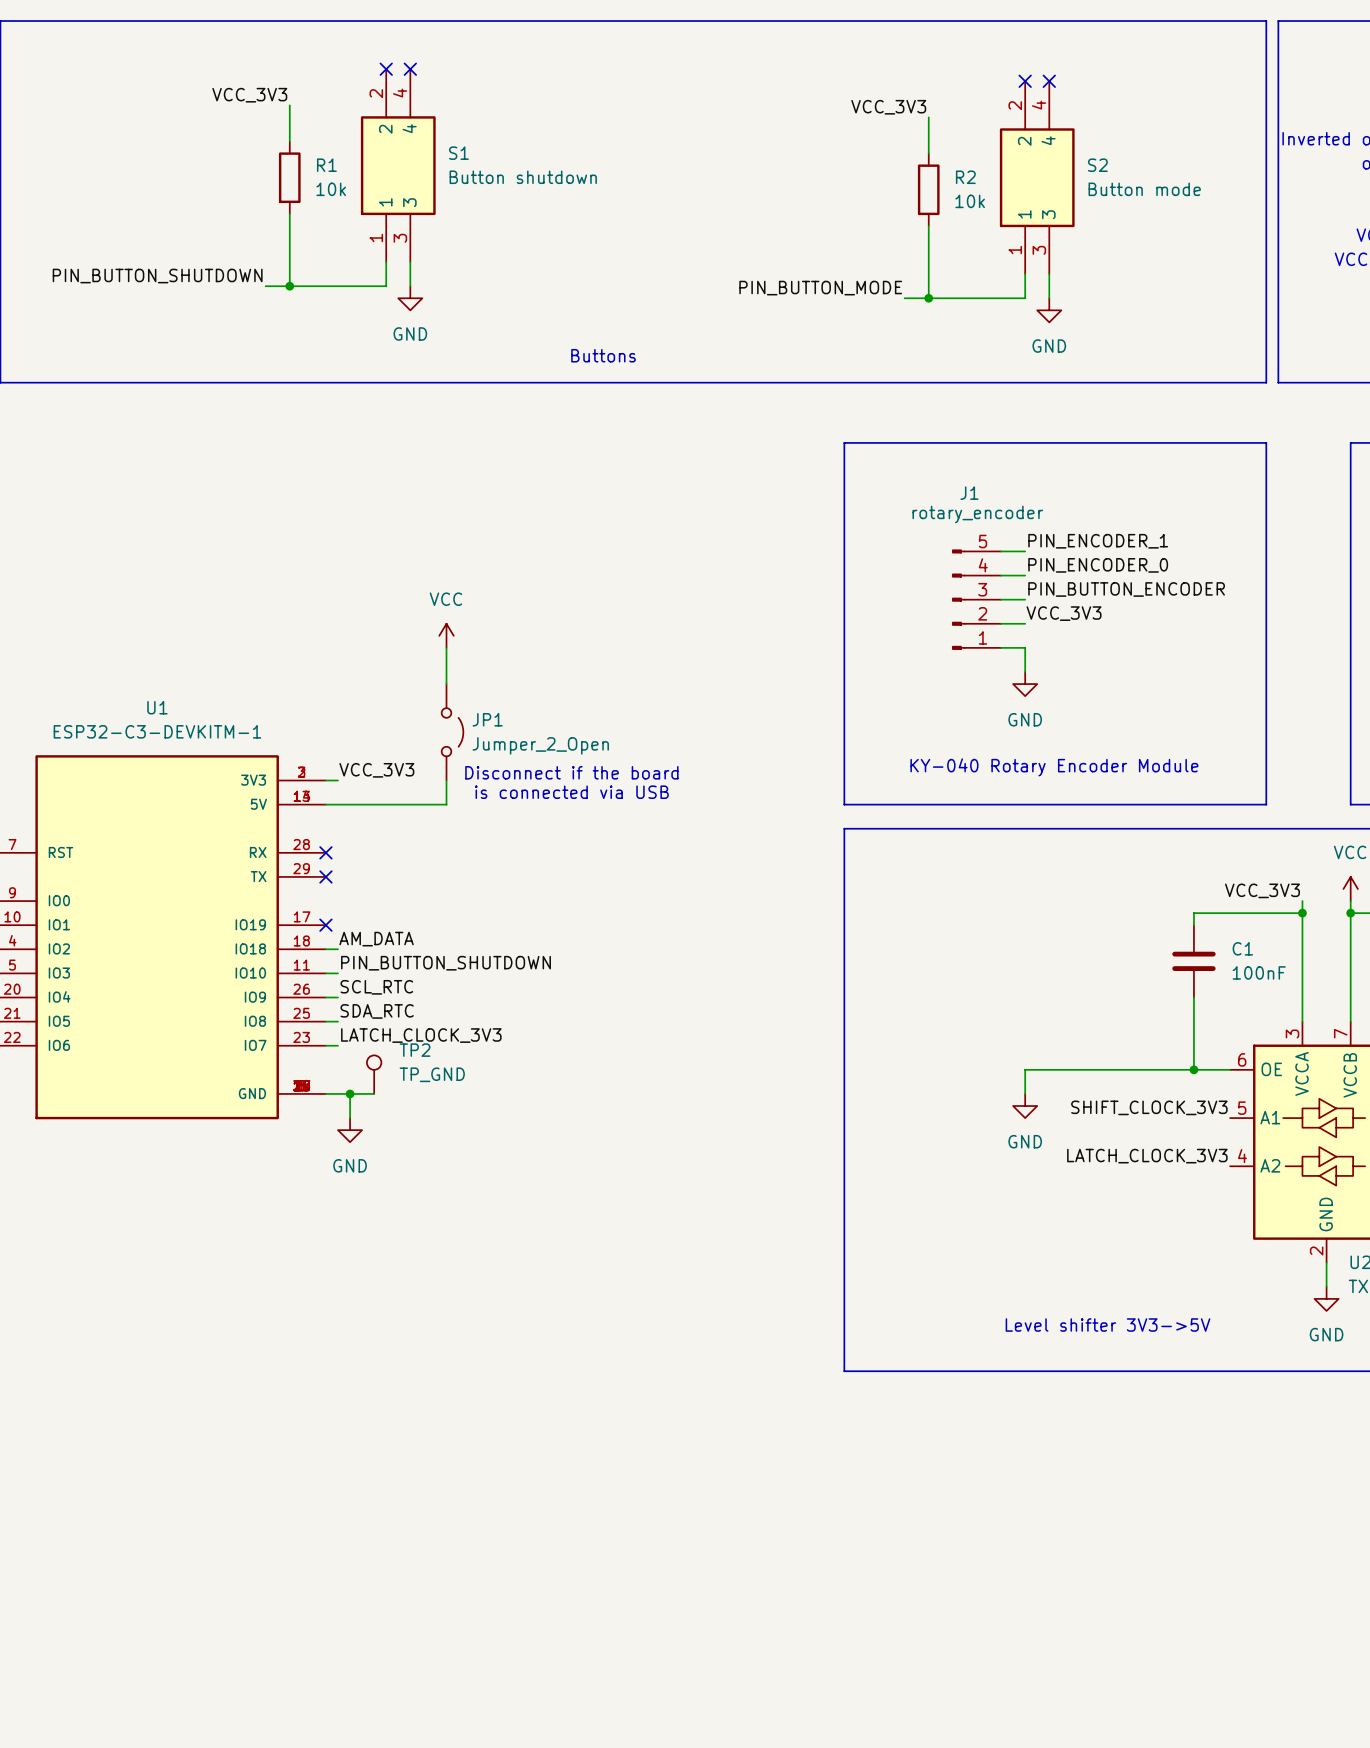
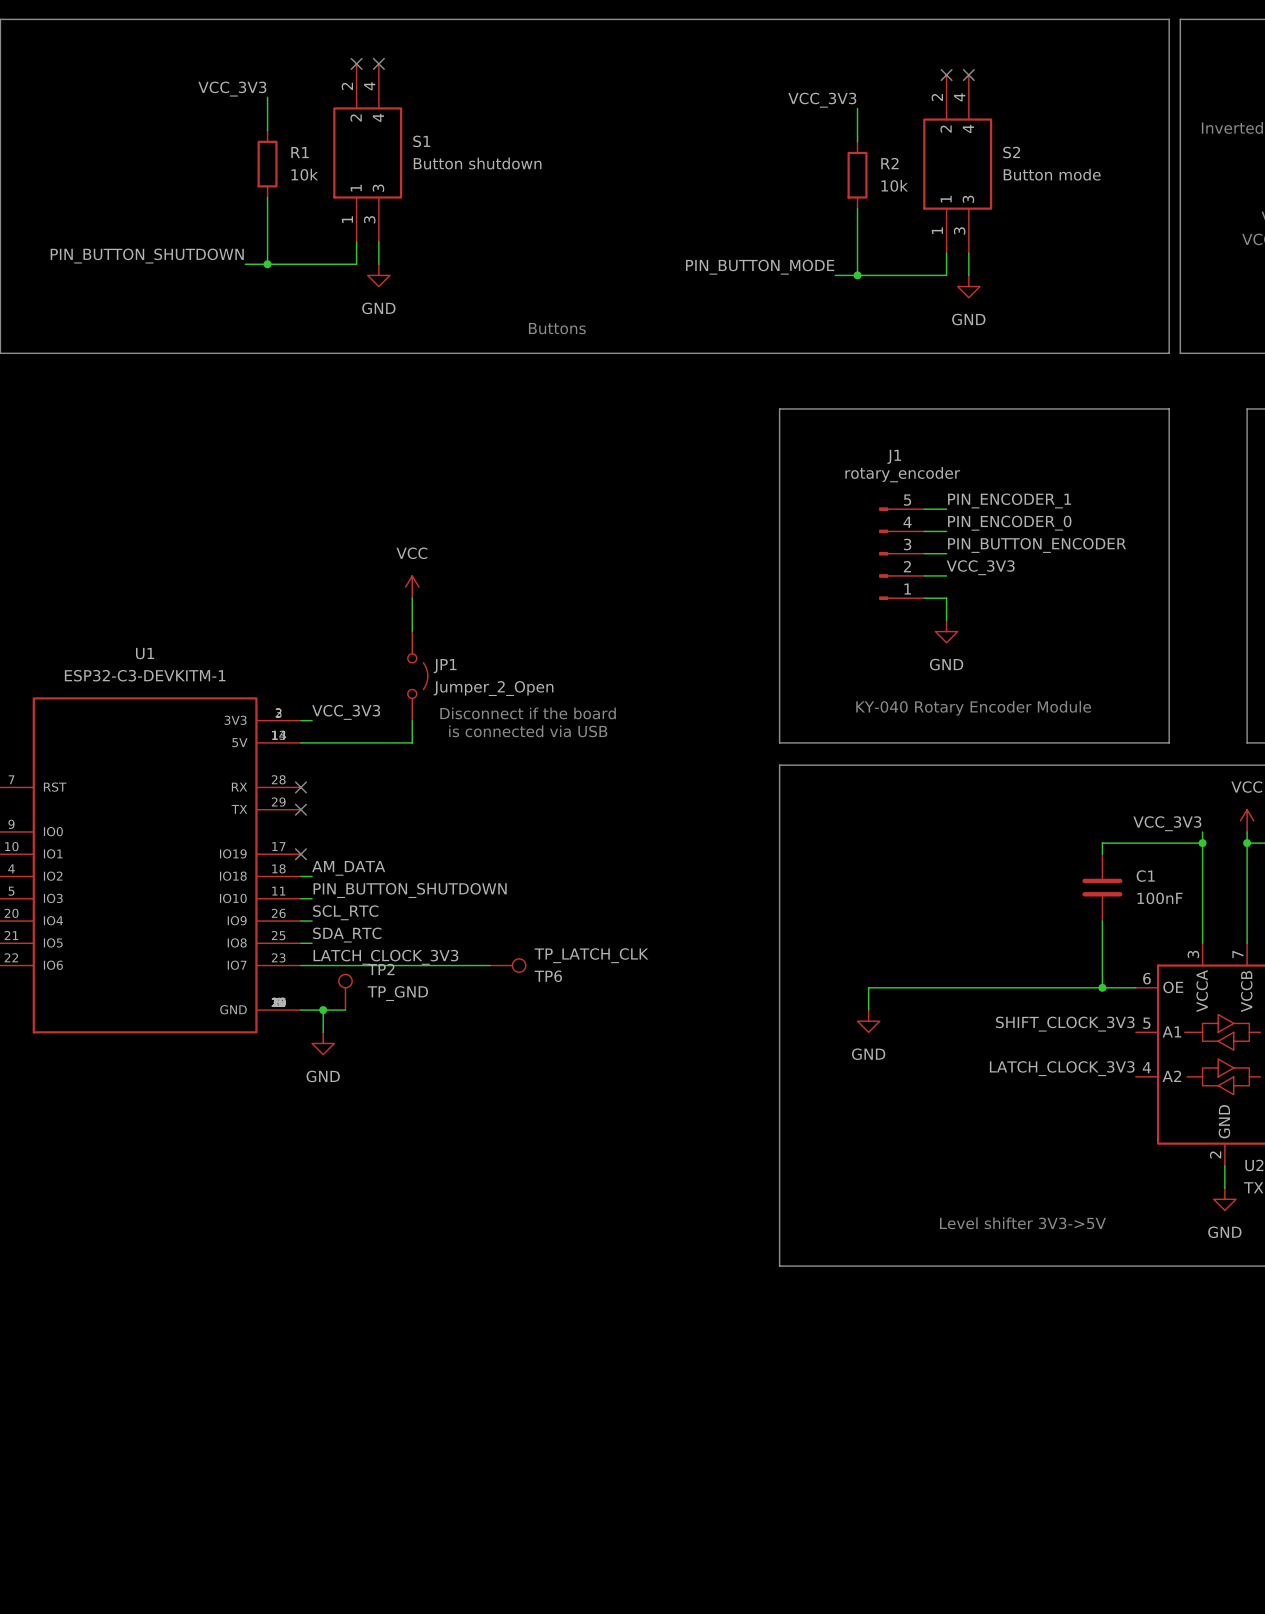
wire: none -> (312, 965) (490, 965)
TP6: none -> TP_LATCH_CLK (507, 965)
wire: (1025, 1069) (1025, 1093) -> (946, 987) (868, 987) (868, 1010)
power symbol position: GND (1025, 1106) -> GND (868, 1021)

